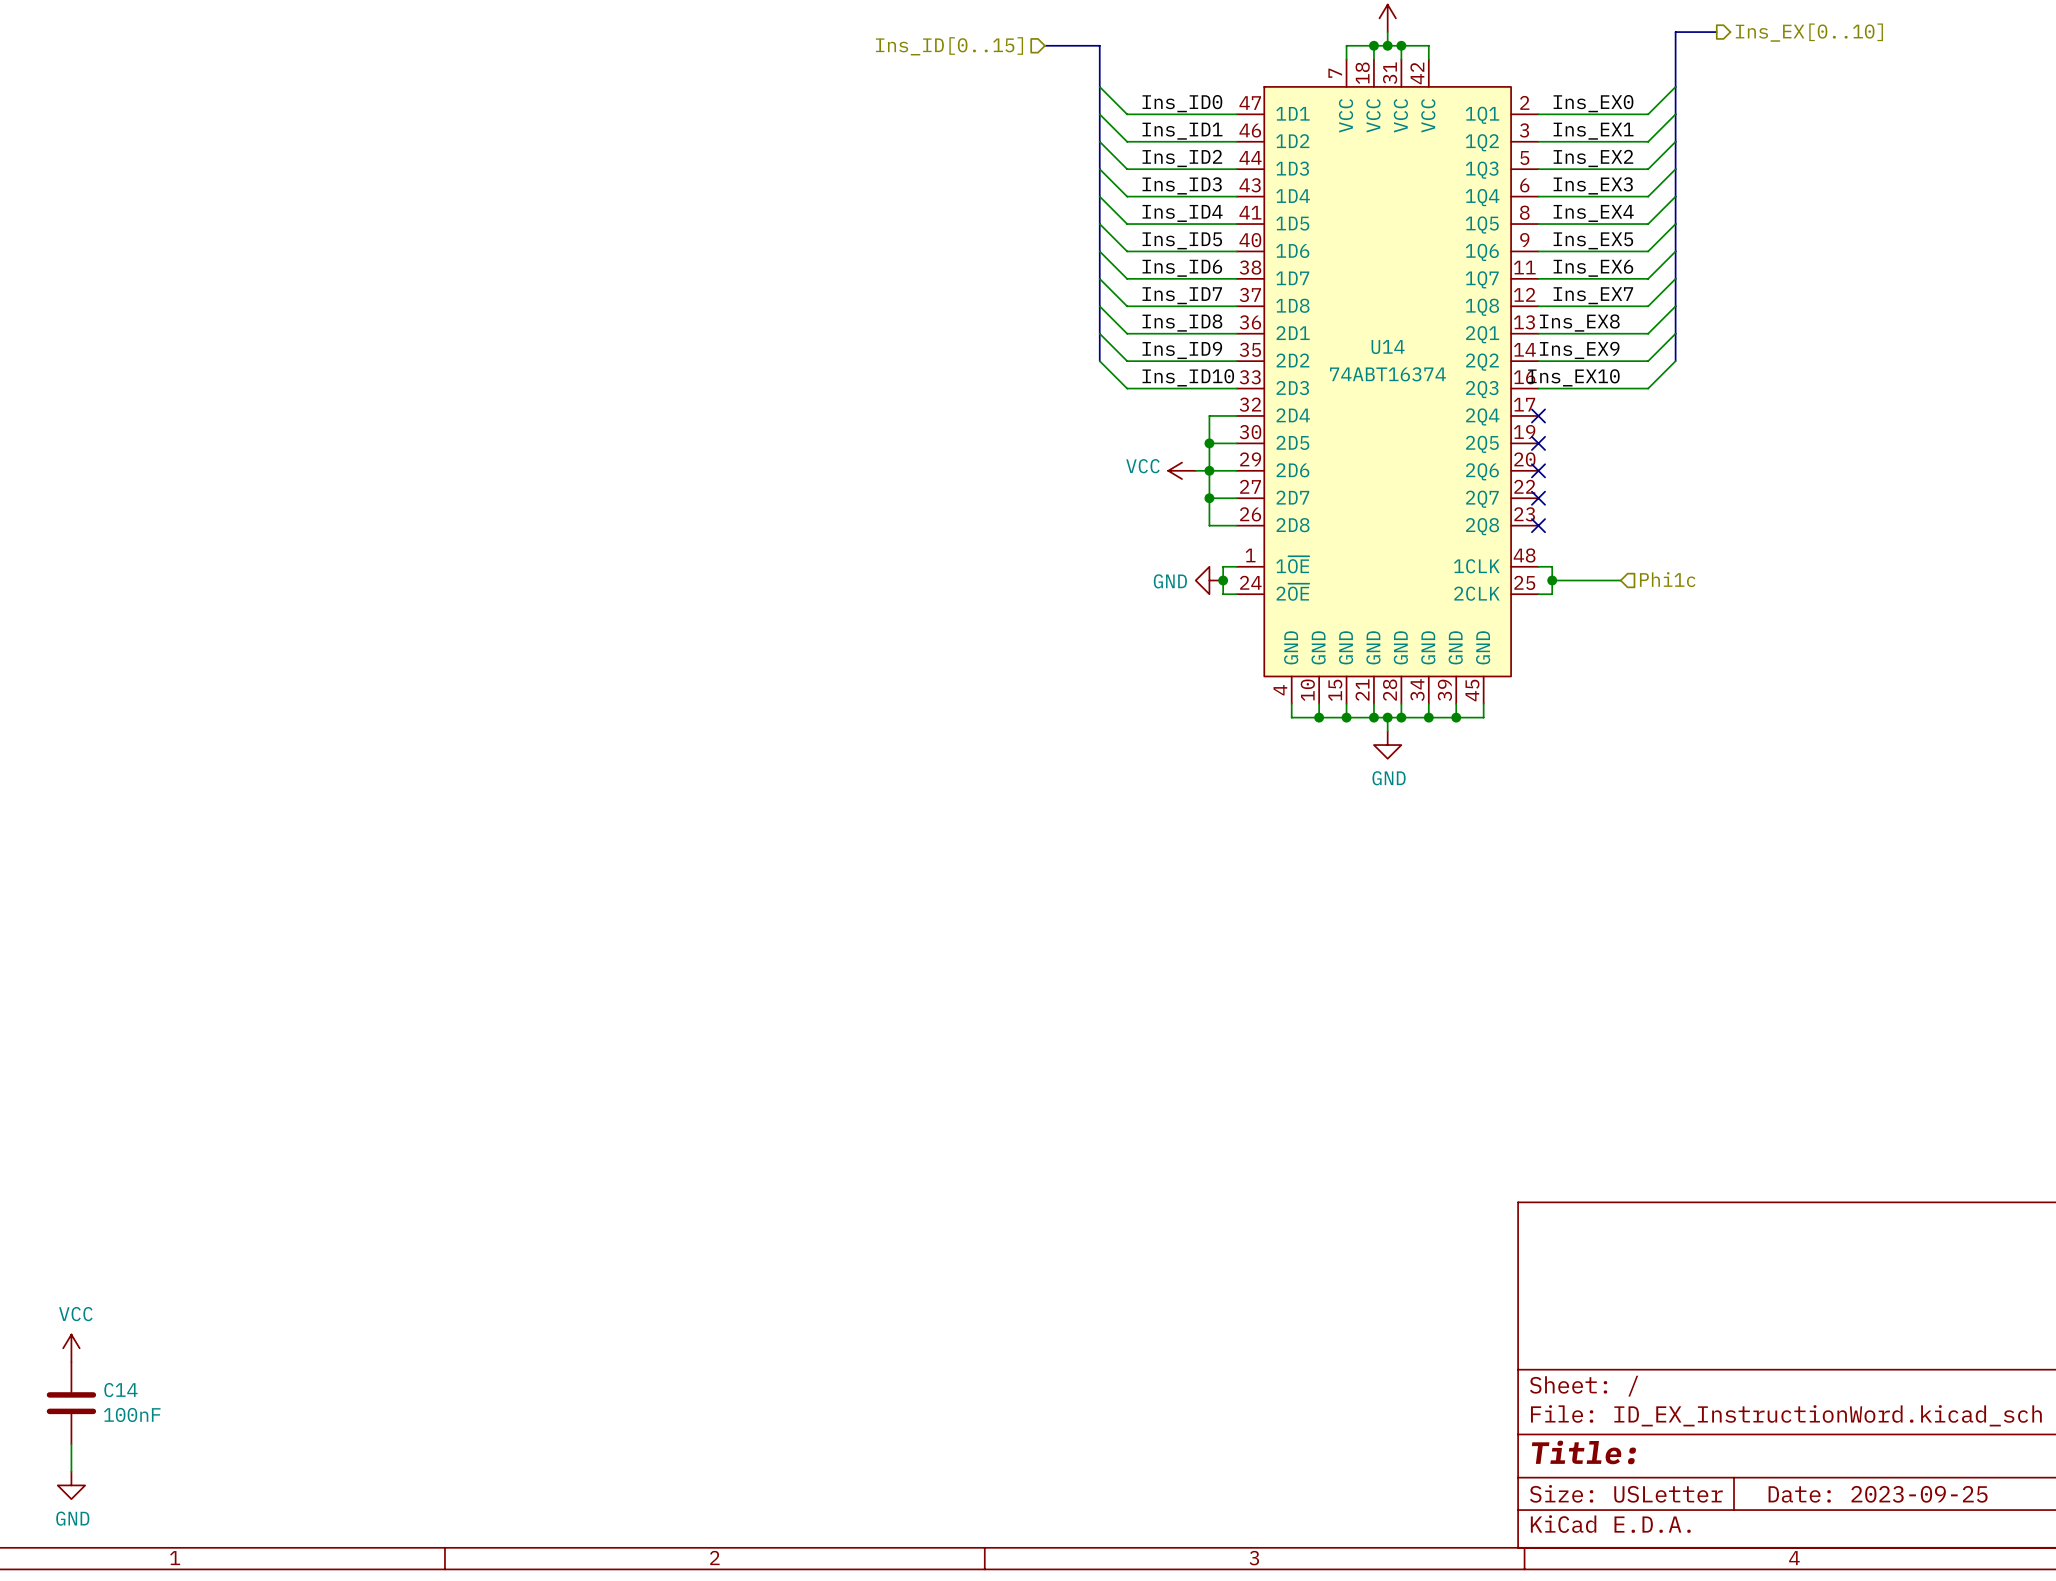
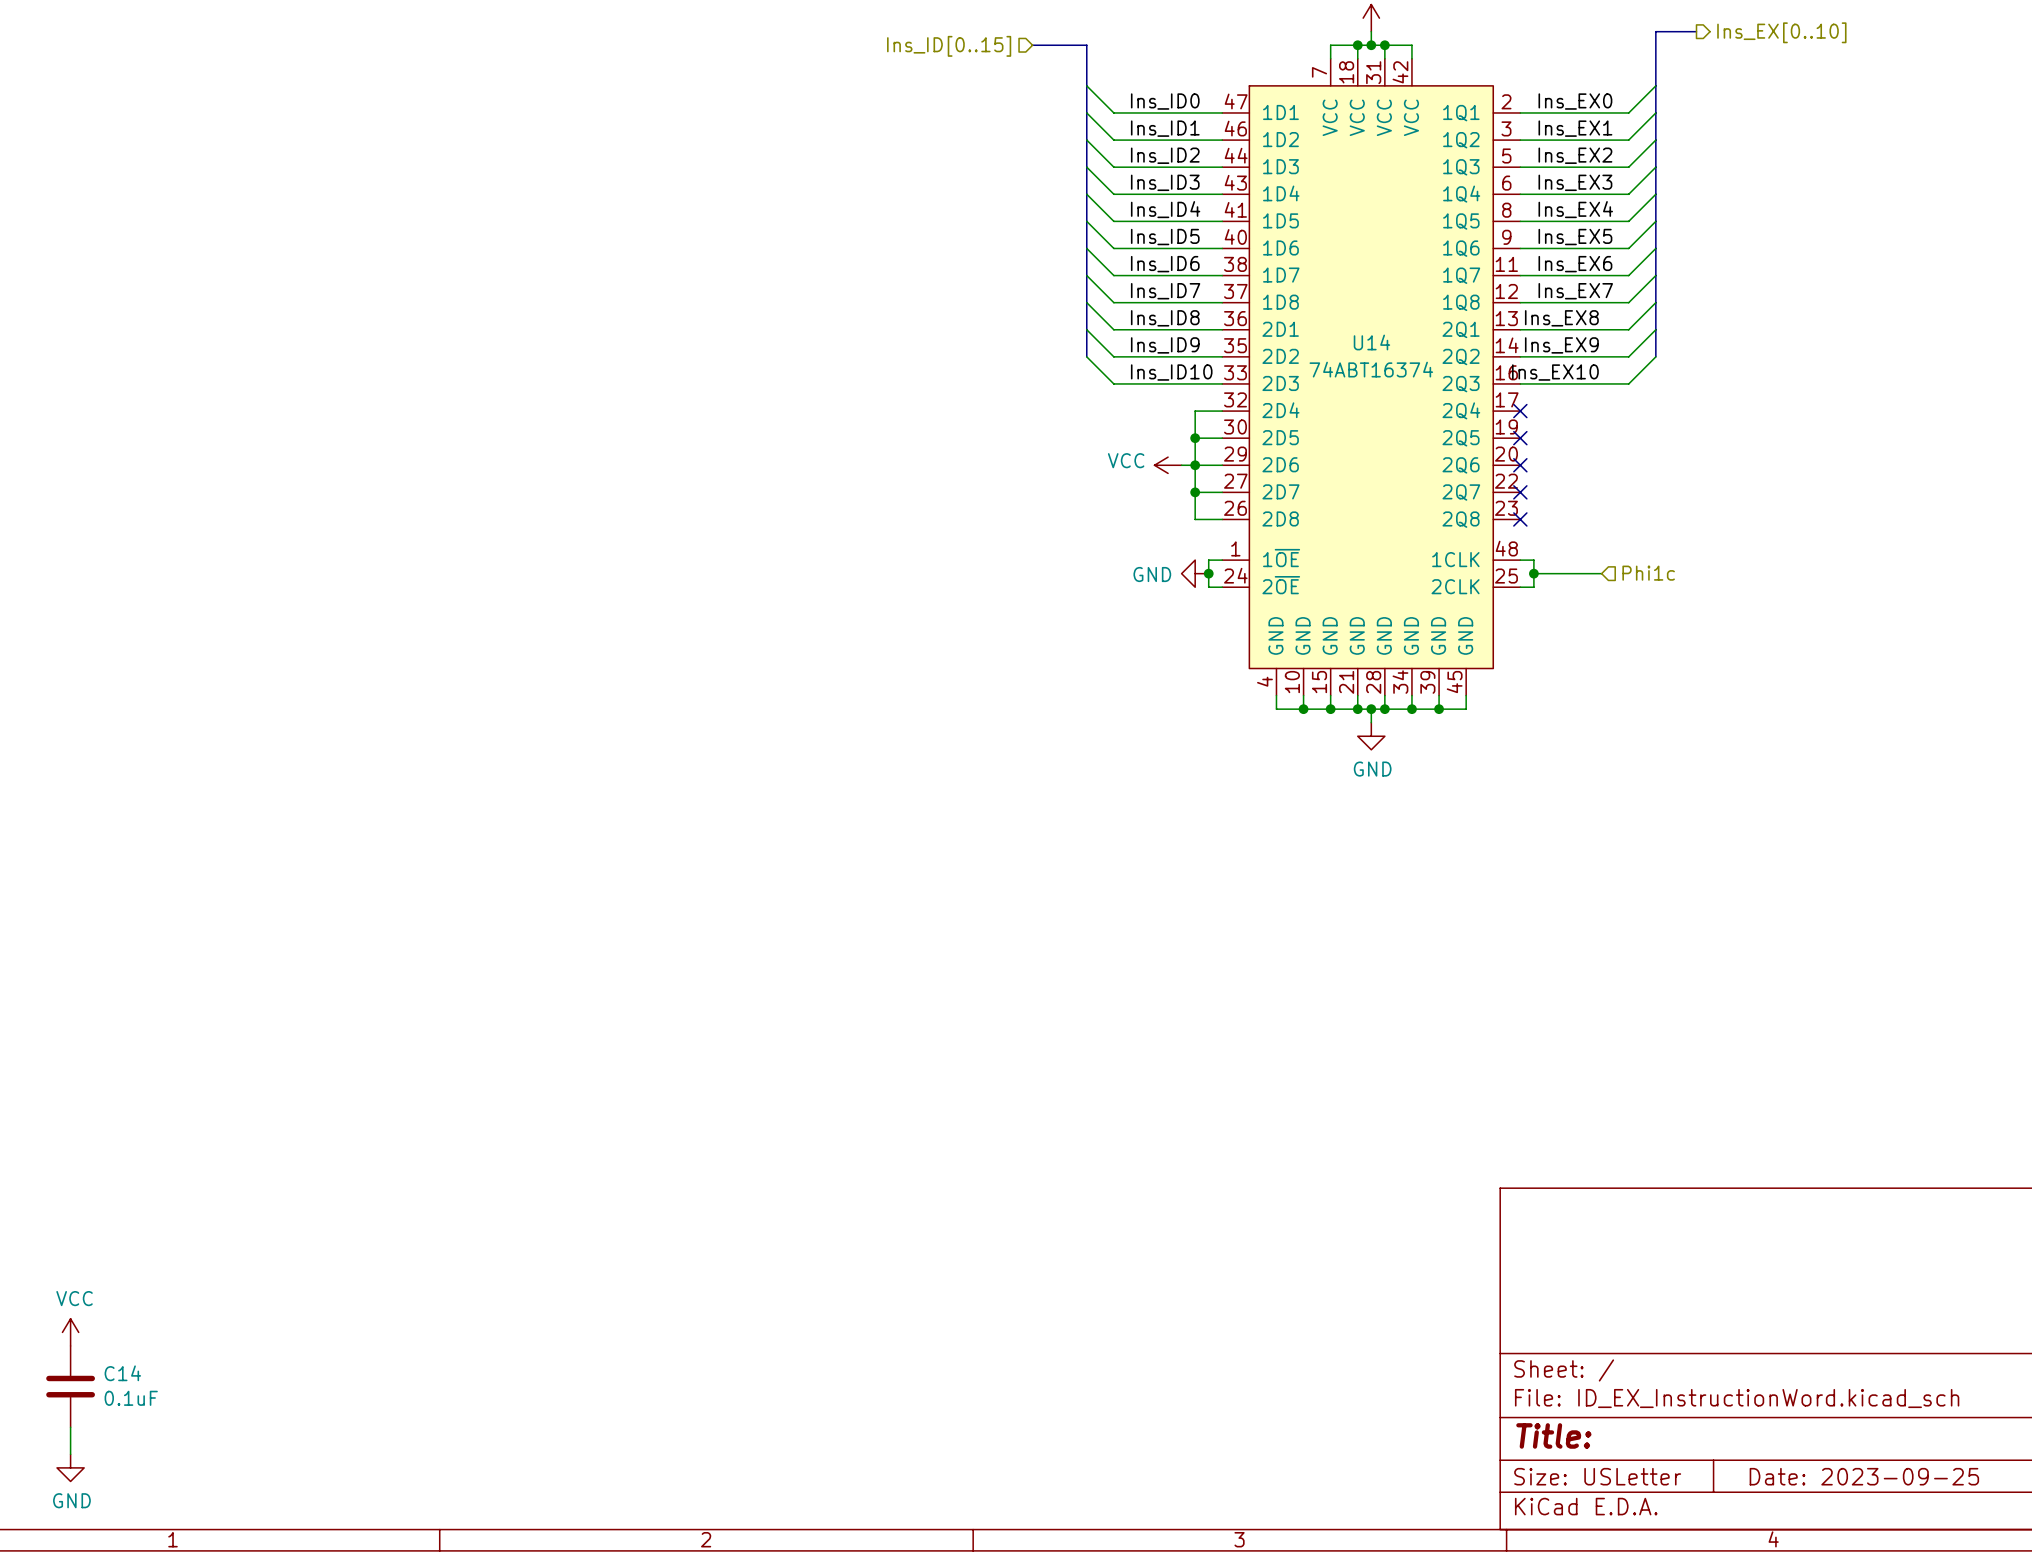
C14 value: 100nF (132, 1414) -> 0.1uF (131, 1398)

